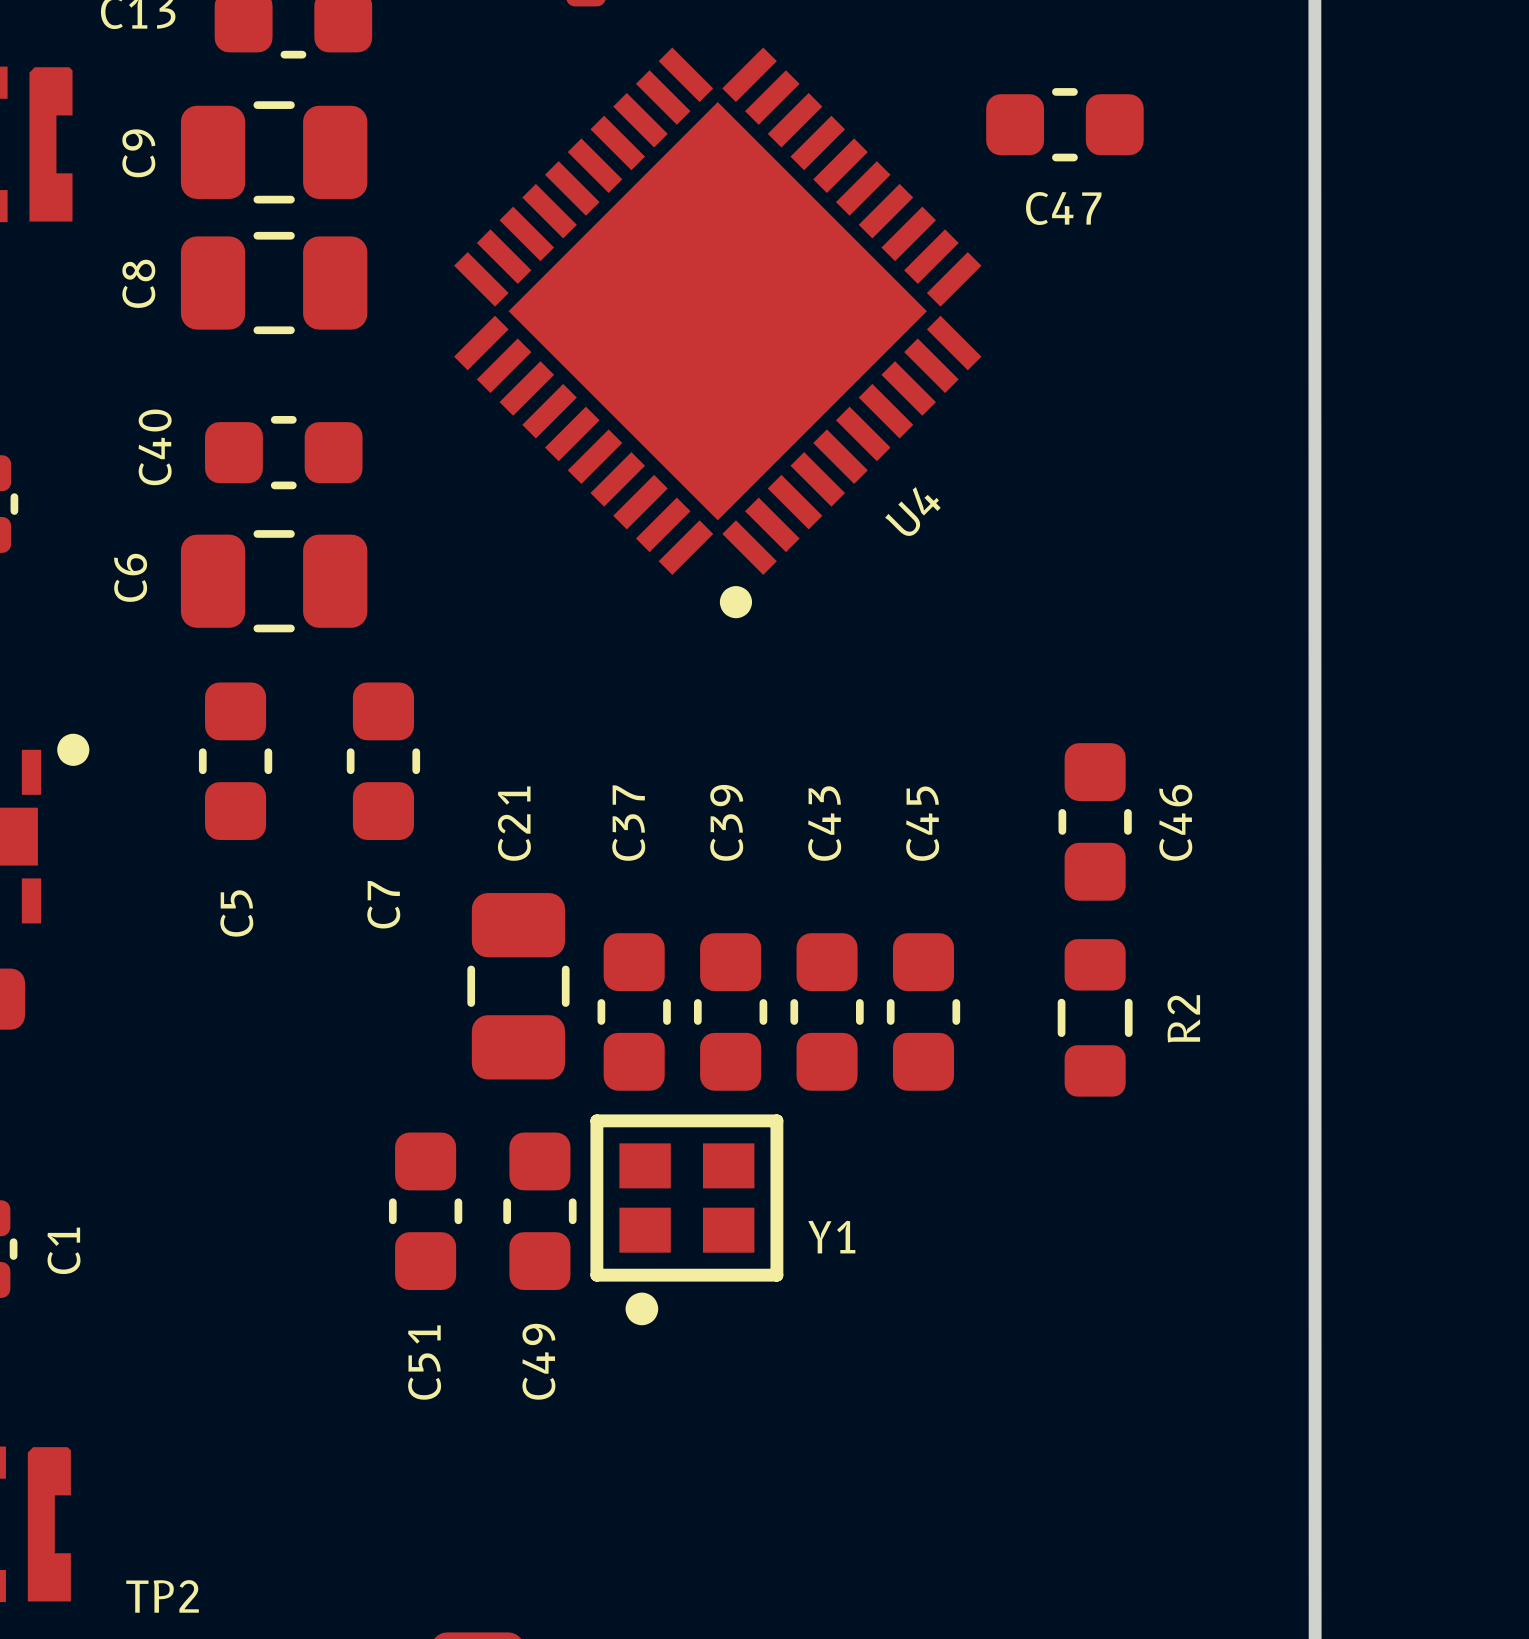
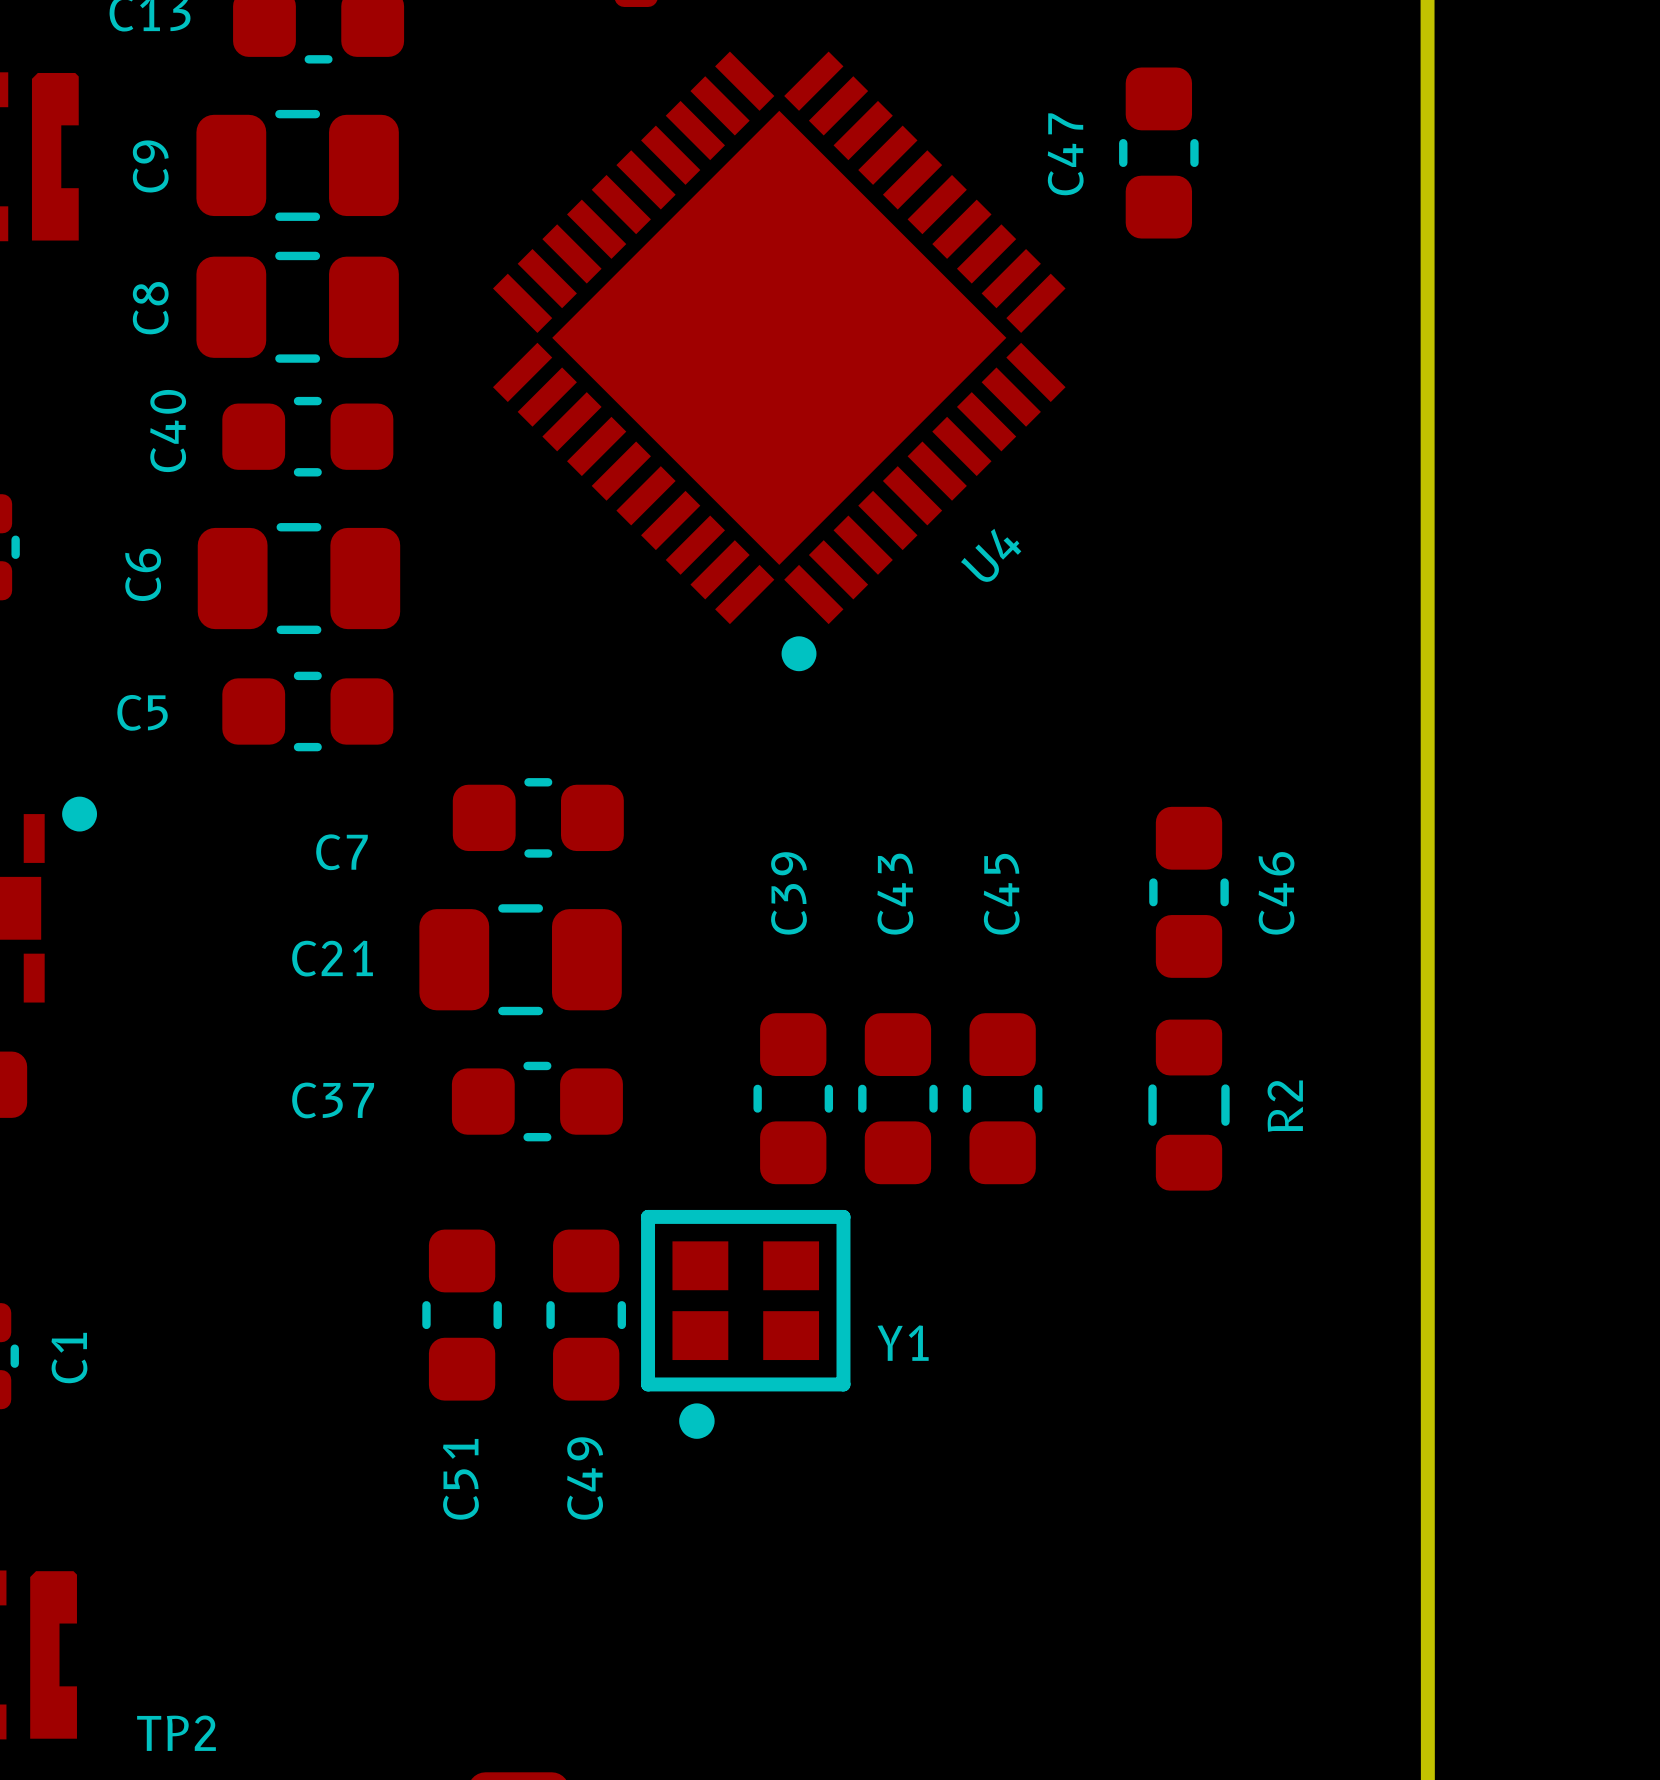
C47 rotation: 0° (1064, 124) -> 90° clockwise (1158, 153)
C40 position: (283, 452) -> (307, 436)
C6 position: (274, 581) -> (298, 578)
C5 rotation: 0° (235, 761) -> 90° clockwise (307, 711)
C5 position: (235, 761) -> (307, 711)
C7 rotation: 0° (383, 761) -> 90° clockwise (538, 817)
C7 position: (383, 761) -> (538, 817)
C21 name position: C21 (514, 823) -> C21 (332, 958)
C37 name position: C37 (628, 823) -> C37 (333, 1100)
C21 rotation: 0° (518, 986) -> 90° clockwise (520, 959)
C37 rotation: 0° (634, 1011) -> 90° clockwise (537, 1101)
C37 position: (634, 1011) -> (537, 1101)

